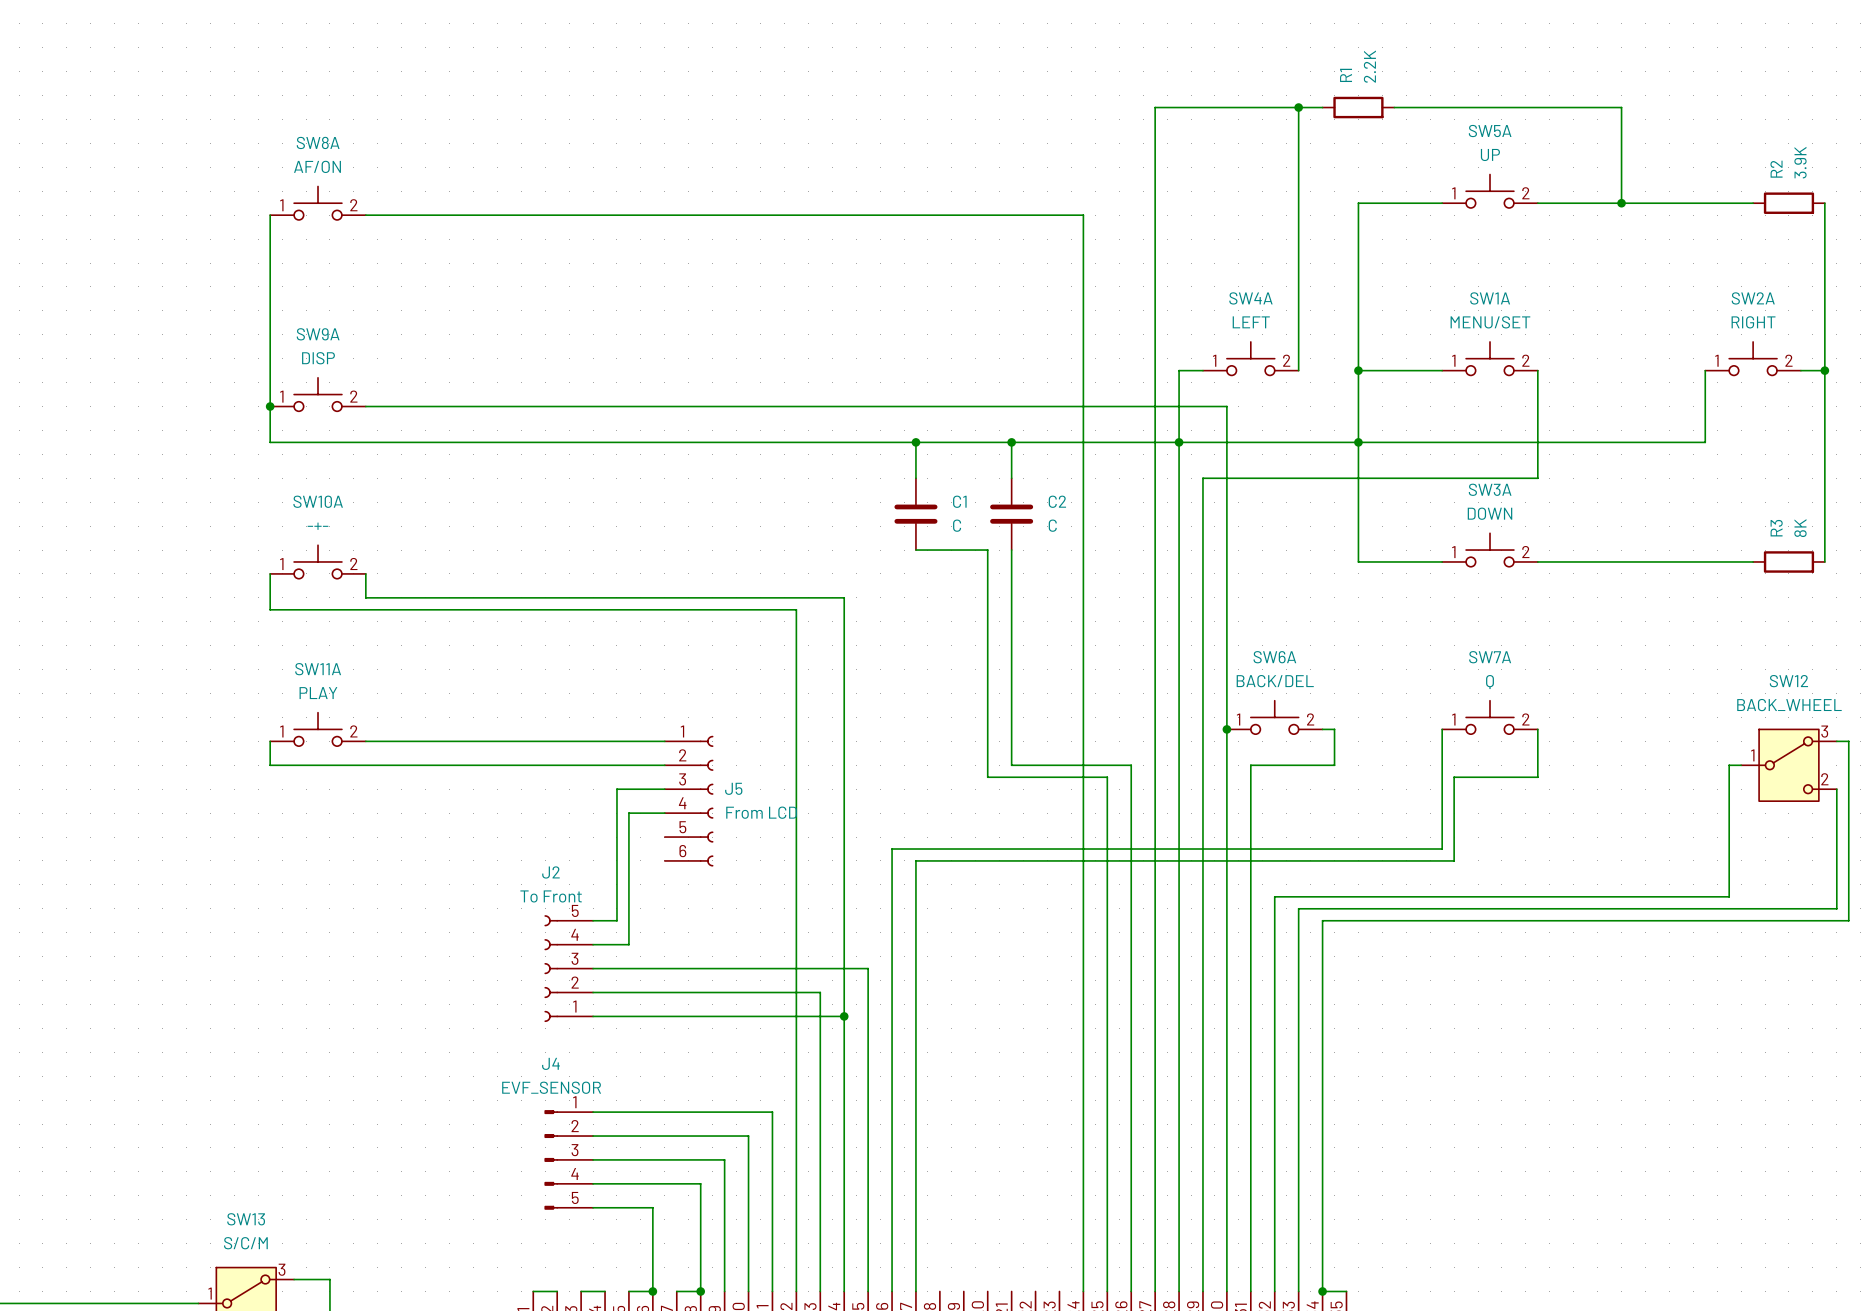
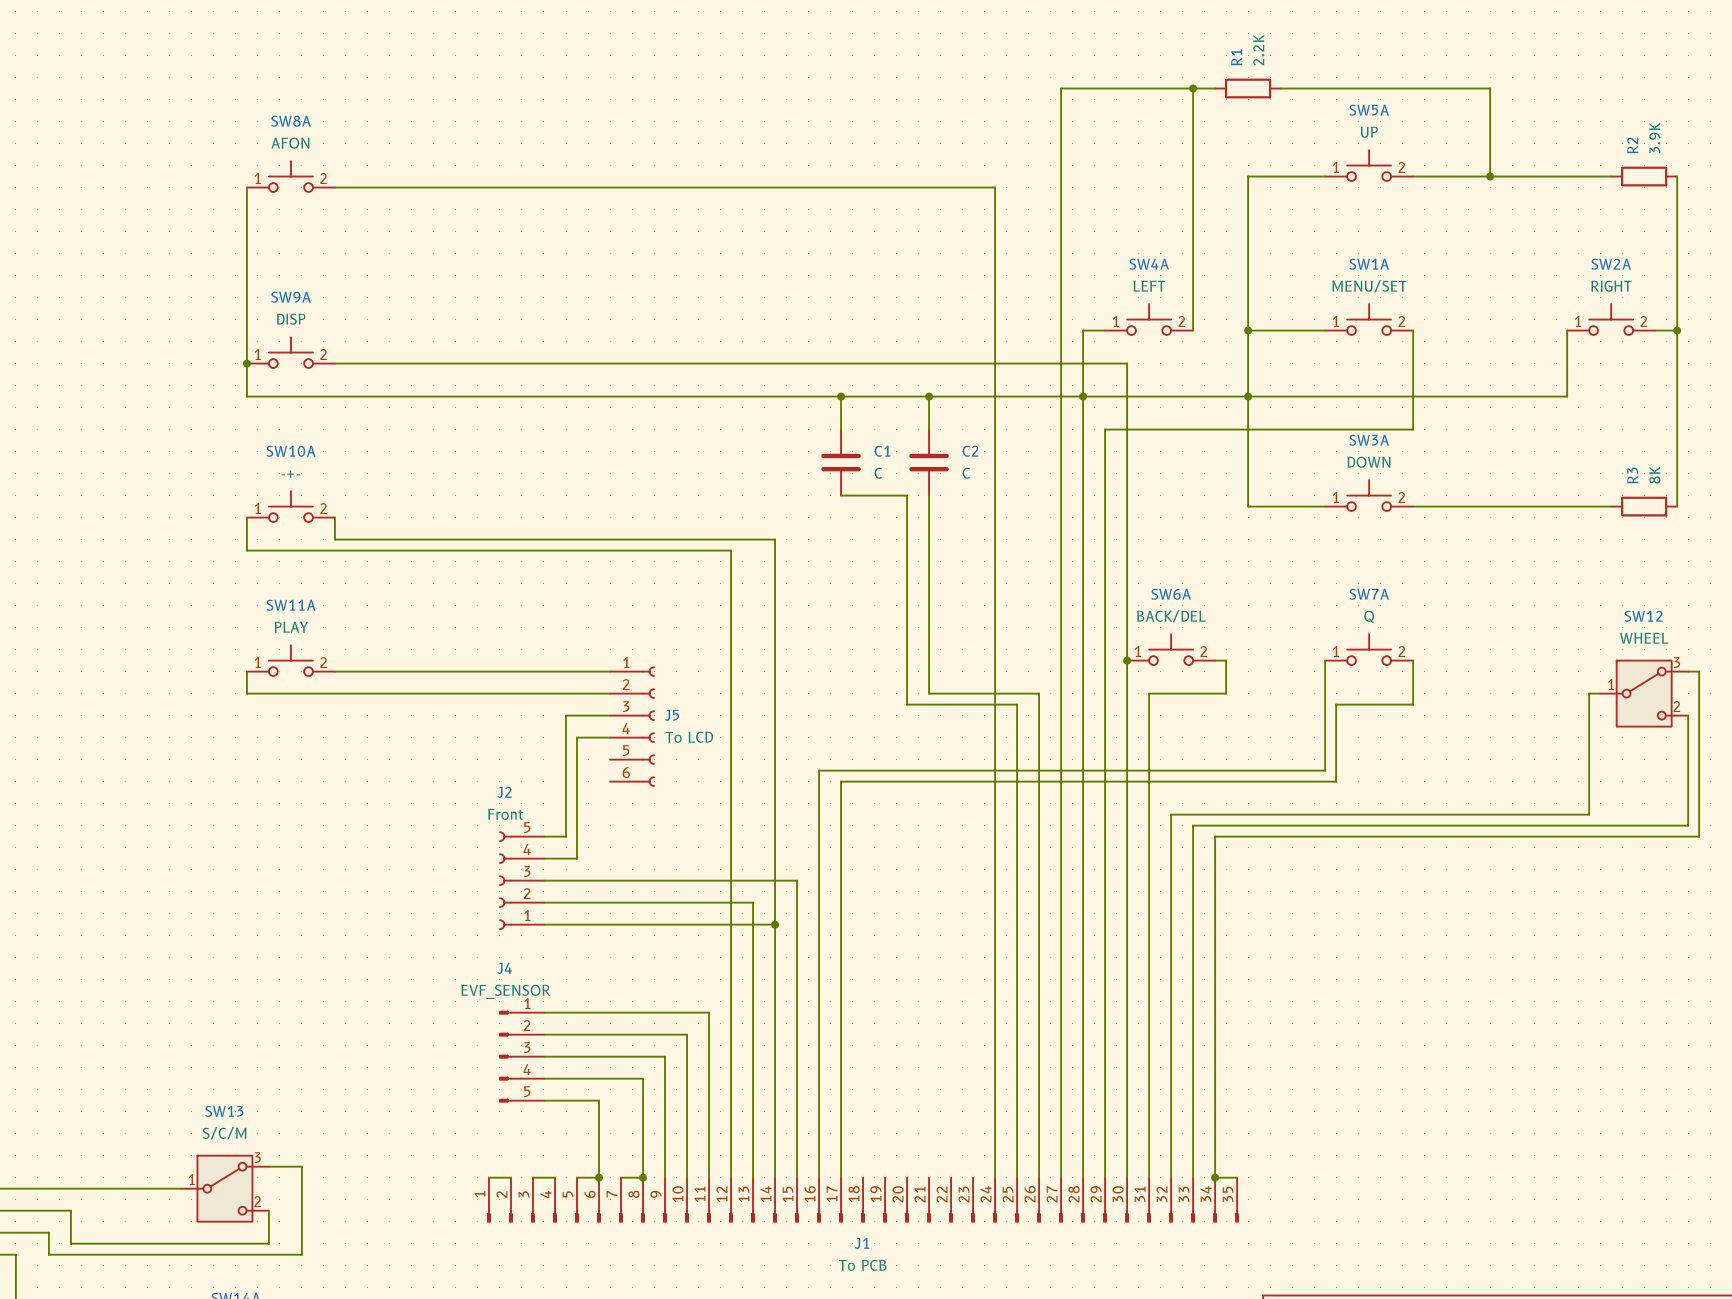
SW8A value: AF/ON (317, 166) -> AFON (290, 143)
SW12 value: BACK_WHEEL (1789, 705) -> WHEEL (1644, 638)
J5 value: From LCD (761, 812) -> To LCD (689, 737)
J2 value: To Front (551, 896) -> Front (505, 814)

